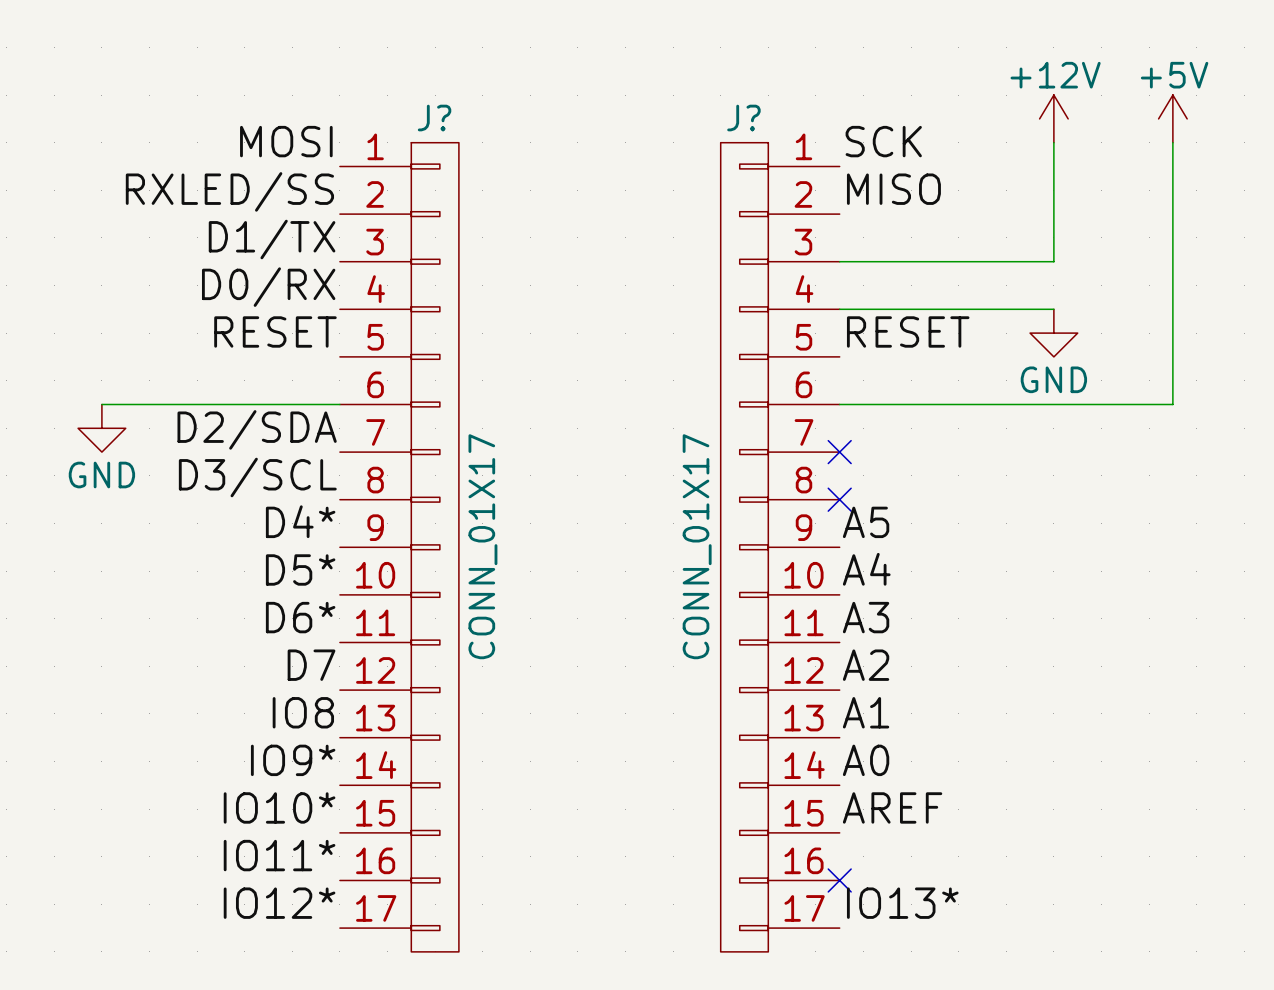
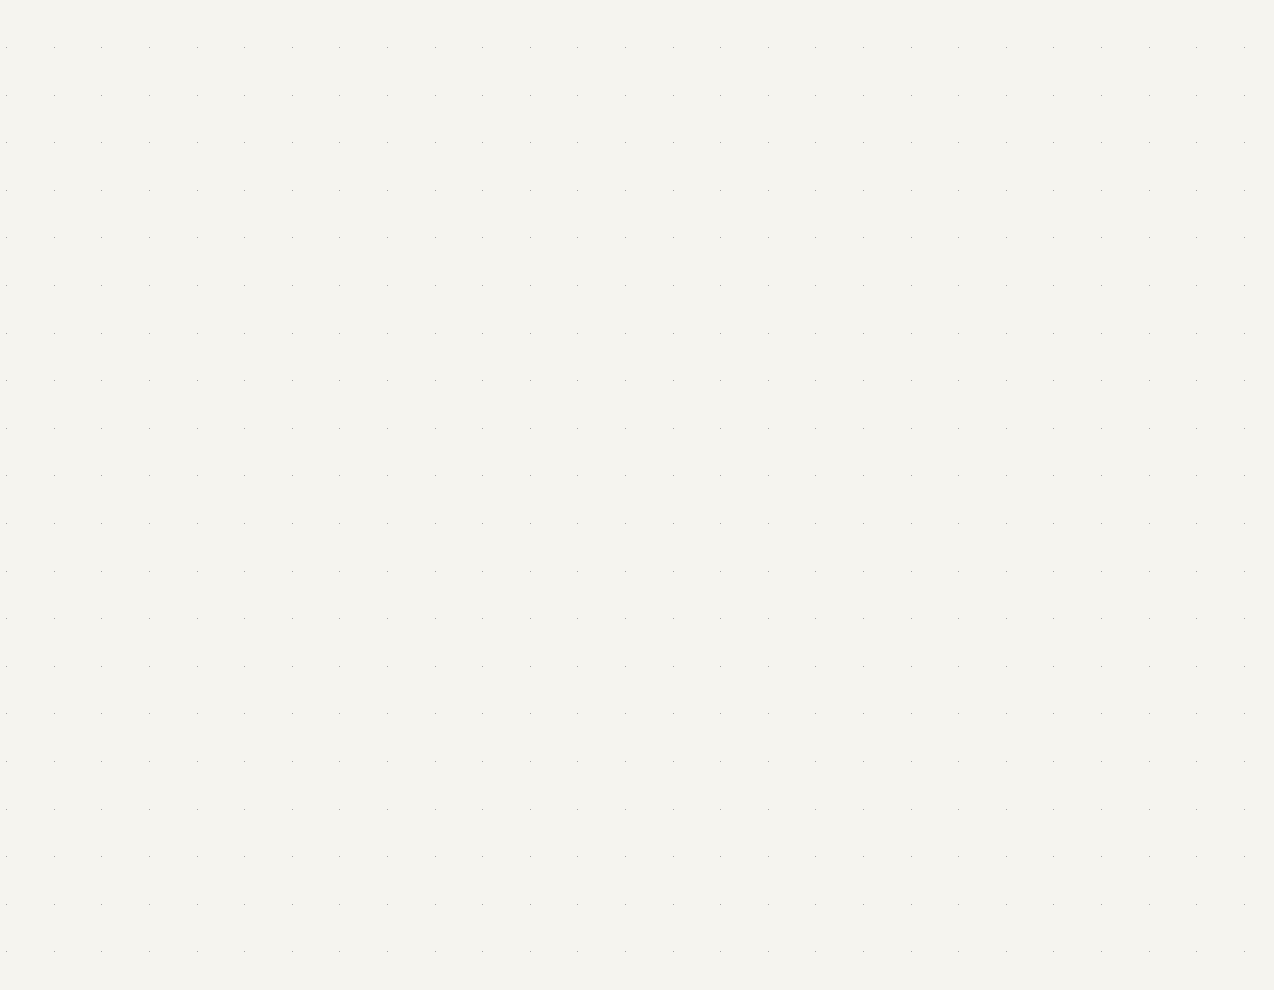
power symbol: +12V (1053, 118) -> none
power symbol: +5V (1172, 118) -> none
label: MOSI (286, 141) -> none
label: SCK (883, 141) -> none
wire: (1053, 142) (1053, 261) (839, 261) -> none
wire: (1172, 142) (1172, 404) (839, 404) -> none
label: MISO (893, 189) -> none
label: RXLED/SS (229, 191) -> none
label: D1/TX (272, 239) -> none
label: D0/RX (268, 287) -> none
wire: (839, 309) (1053, 309) -> none
label: RESET (275, 331) -> none
label: RESET (908, 331) -> none
power symbol: GND (1053, 333) -> none
wire: (101, 404) (339, 404) -> none
power symbol: GND (101, 428) -> none
label: D2/SDA (257, 429) -> none
no-connect mark: (839, 452) -> none
label: D3/SCL (257, 477) -> none
no-connect mark: (839, 499) -> none
label: D4* (300, 521) -> none
label: A5 (866, 522) -> none
J?: CONN_01X17 (399, 547) -> none
J?: CONN_01X17 (780, 547) -> none
label: D5* (300, 569) -> none
label: A4 (866, 569) -> none
label: D6* (300, 617) -> none
label: A3 (866, 617) -> none
label: D7 (311, 665) -> none
label: A2 (866, 665) -> none
label: IO8 (303, 712) -> none
label: A1 (866, 712) -> none
label: IO9* (293, 760) -> none
label: A0 (866, 760) -> none
label: IO10* (279, 807) -> none
label: AREF (892, 807) -> none
label: IO11* (279, 855) -> none
no-connect mark: (839, 880) -> none
label: IO12* (279, 903) -> none
label: IO13* (902, 903) -> none

